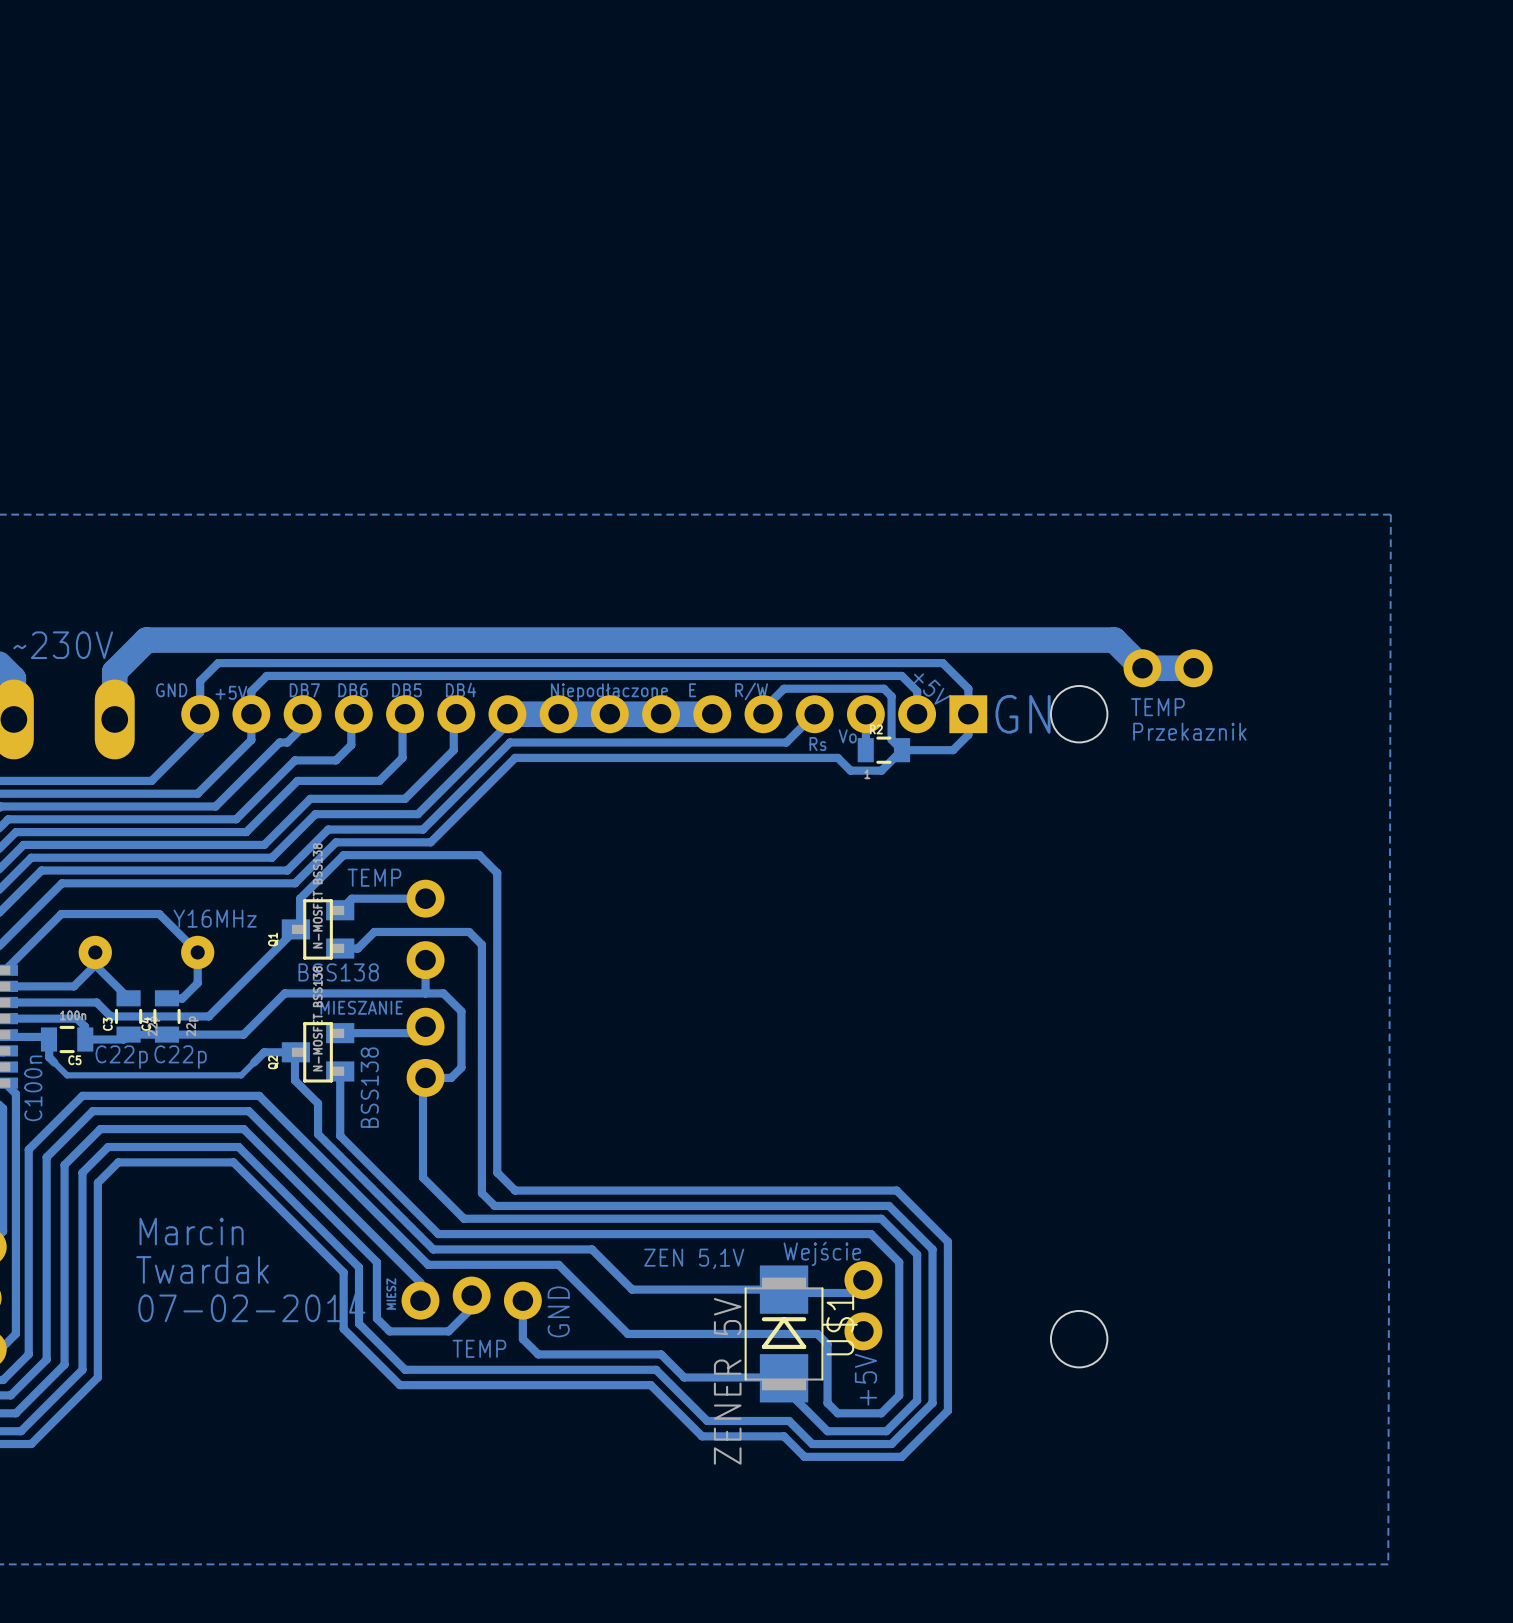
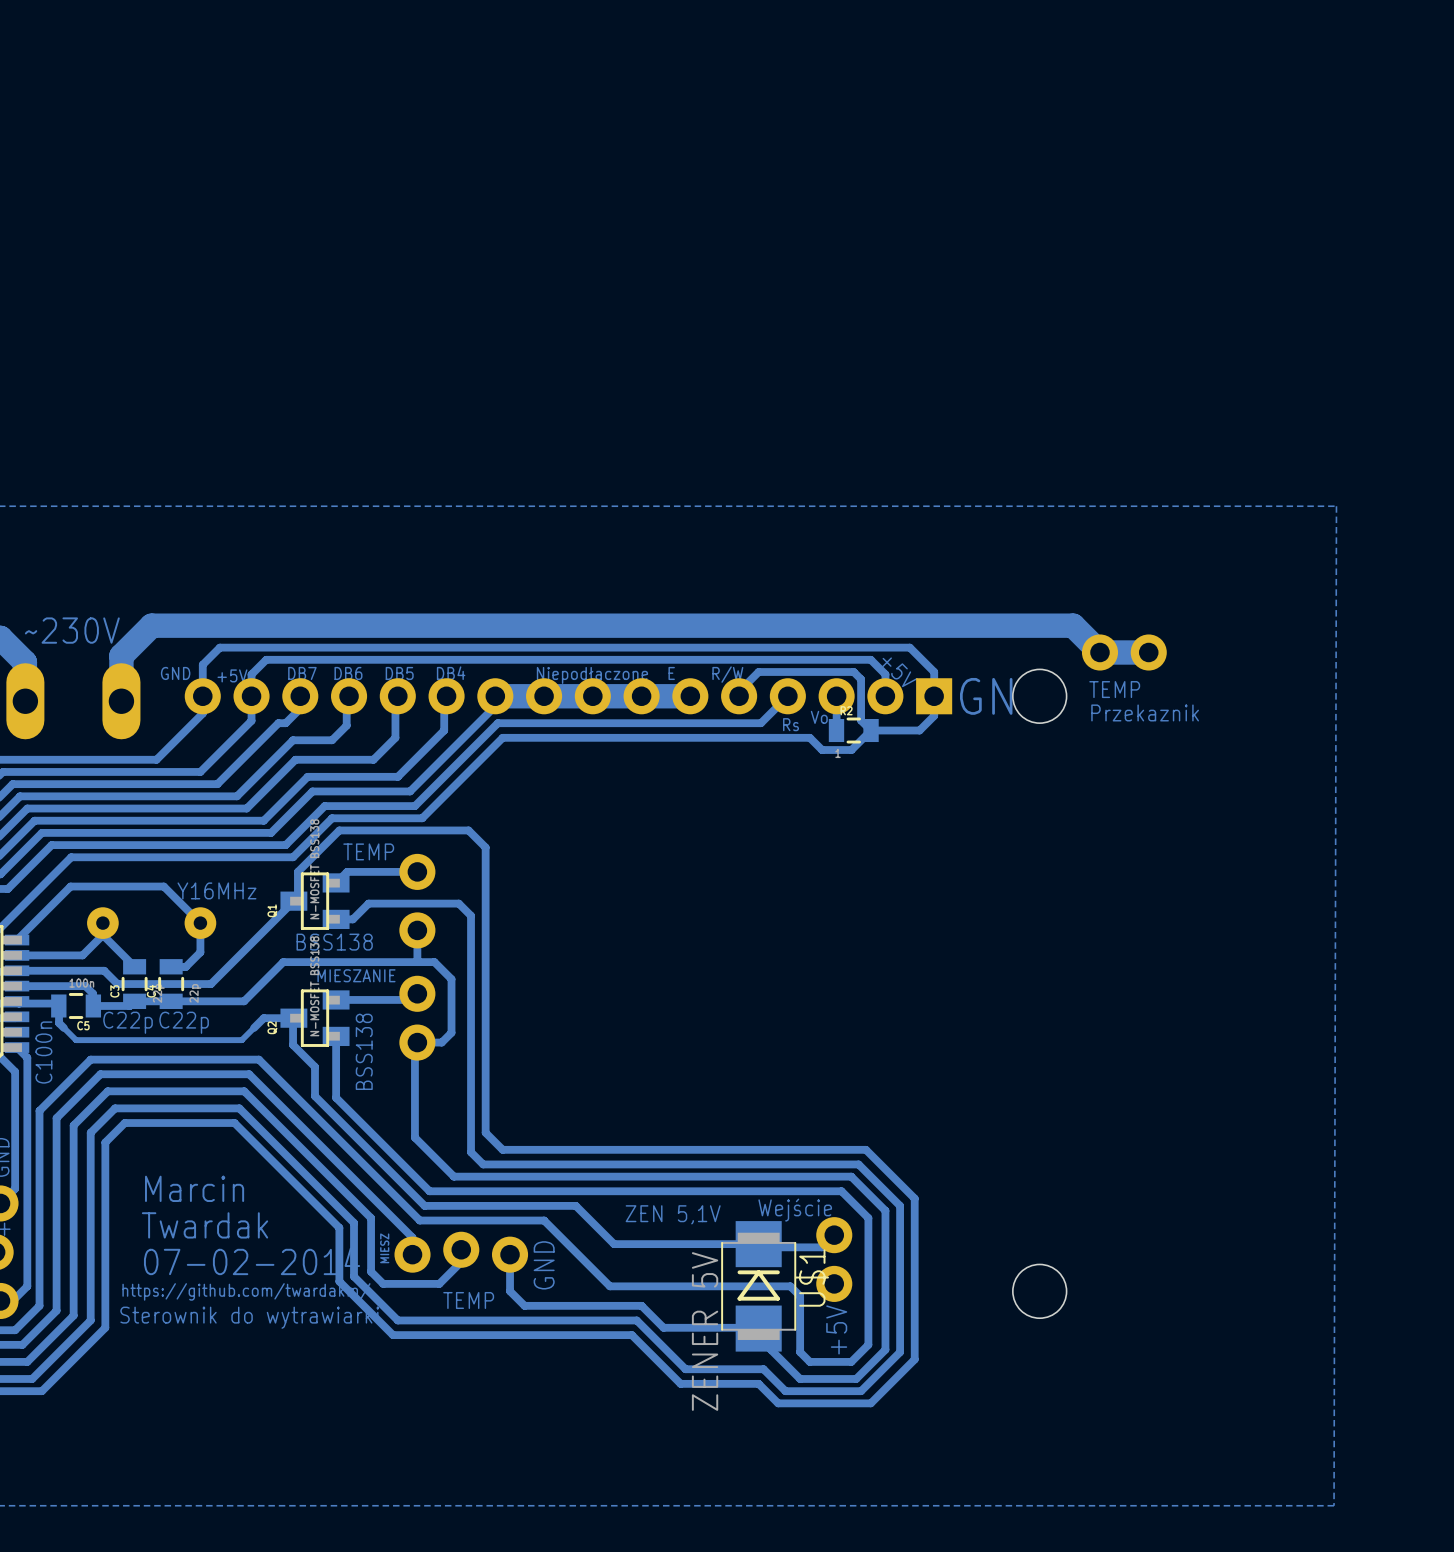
text: none -> https://github.com/twardakm/ (246, 1291)
text: none -> Sterownik do wytrawiarki (249, 1317)

